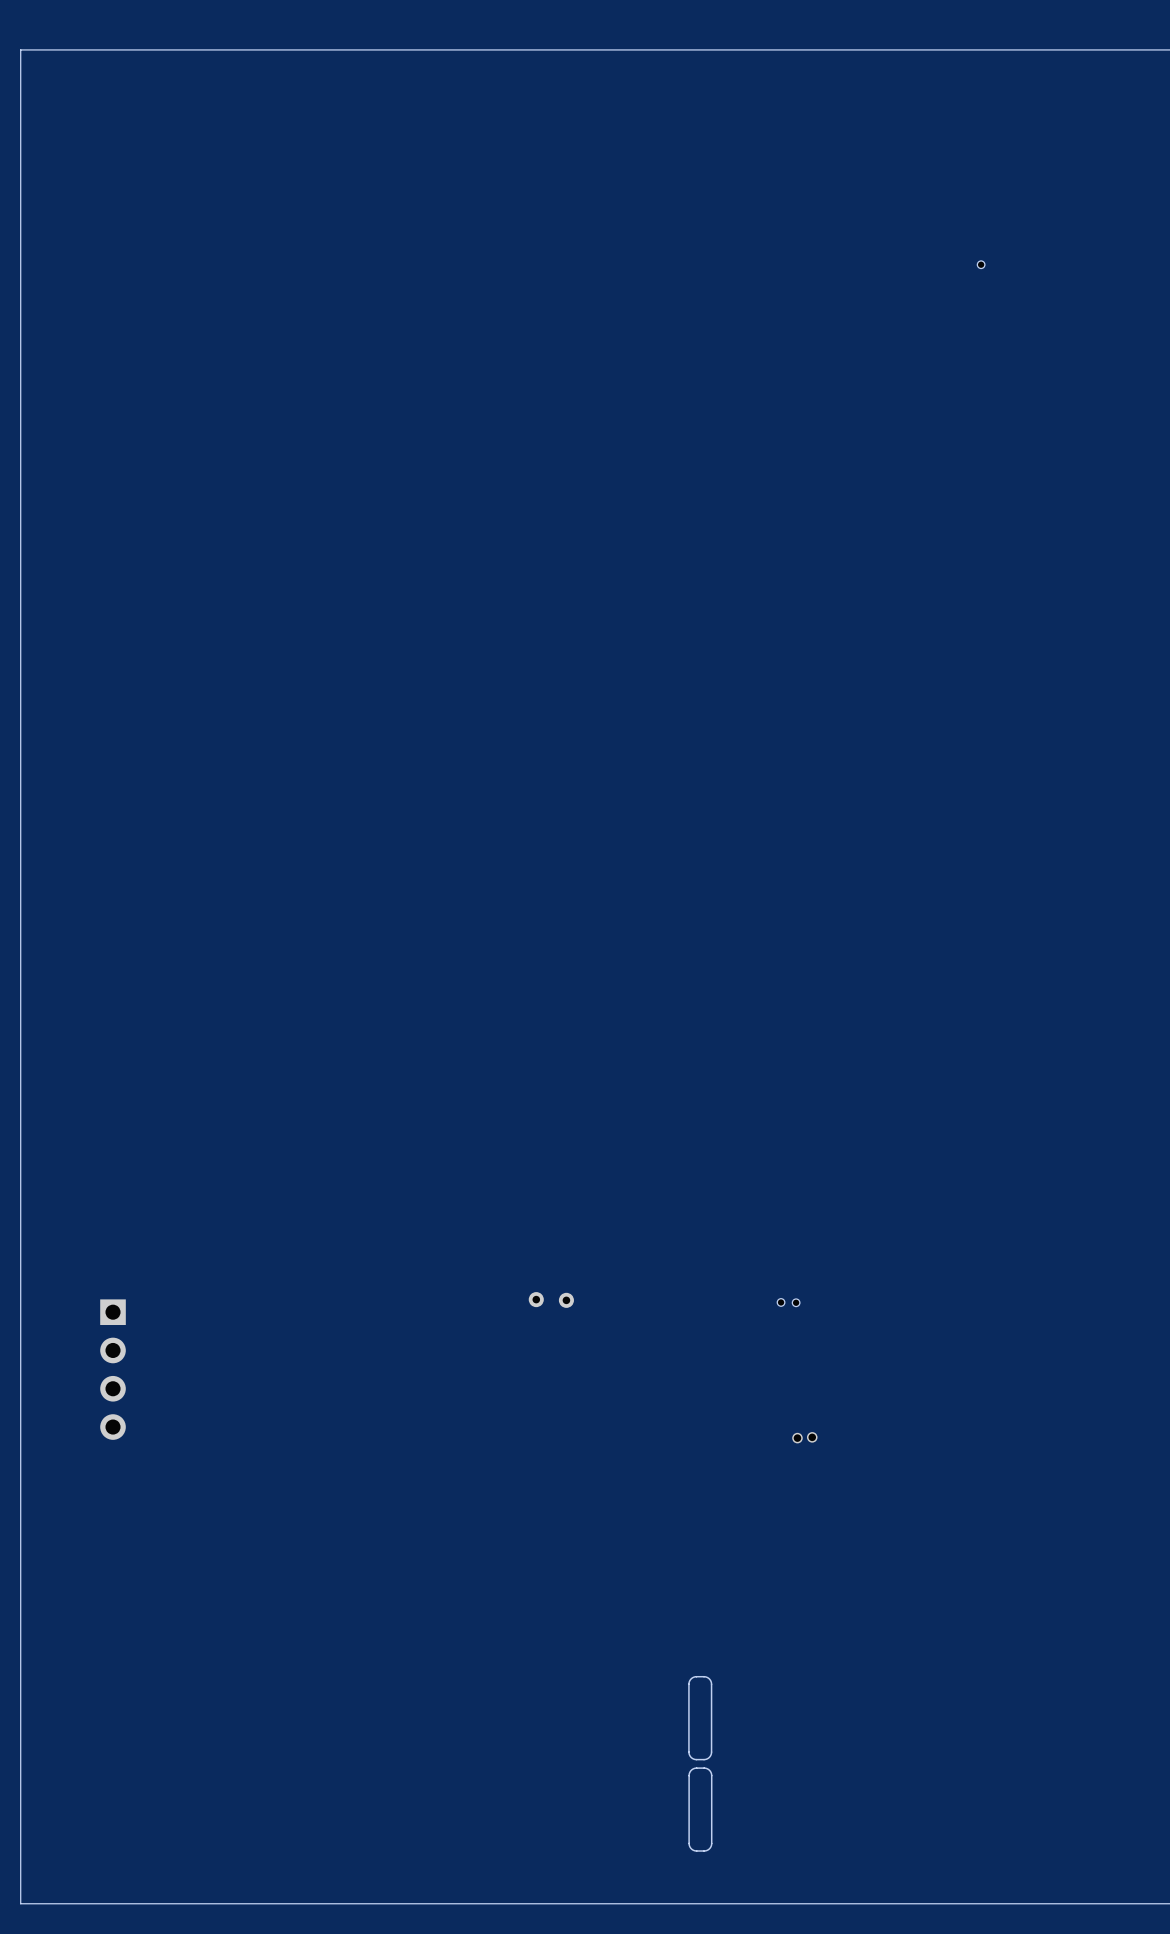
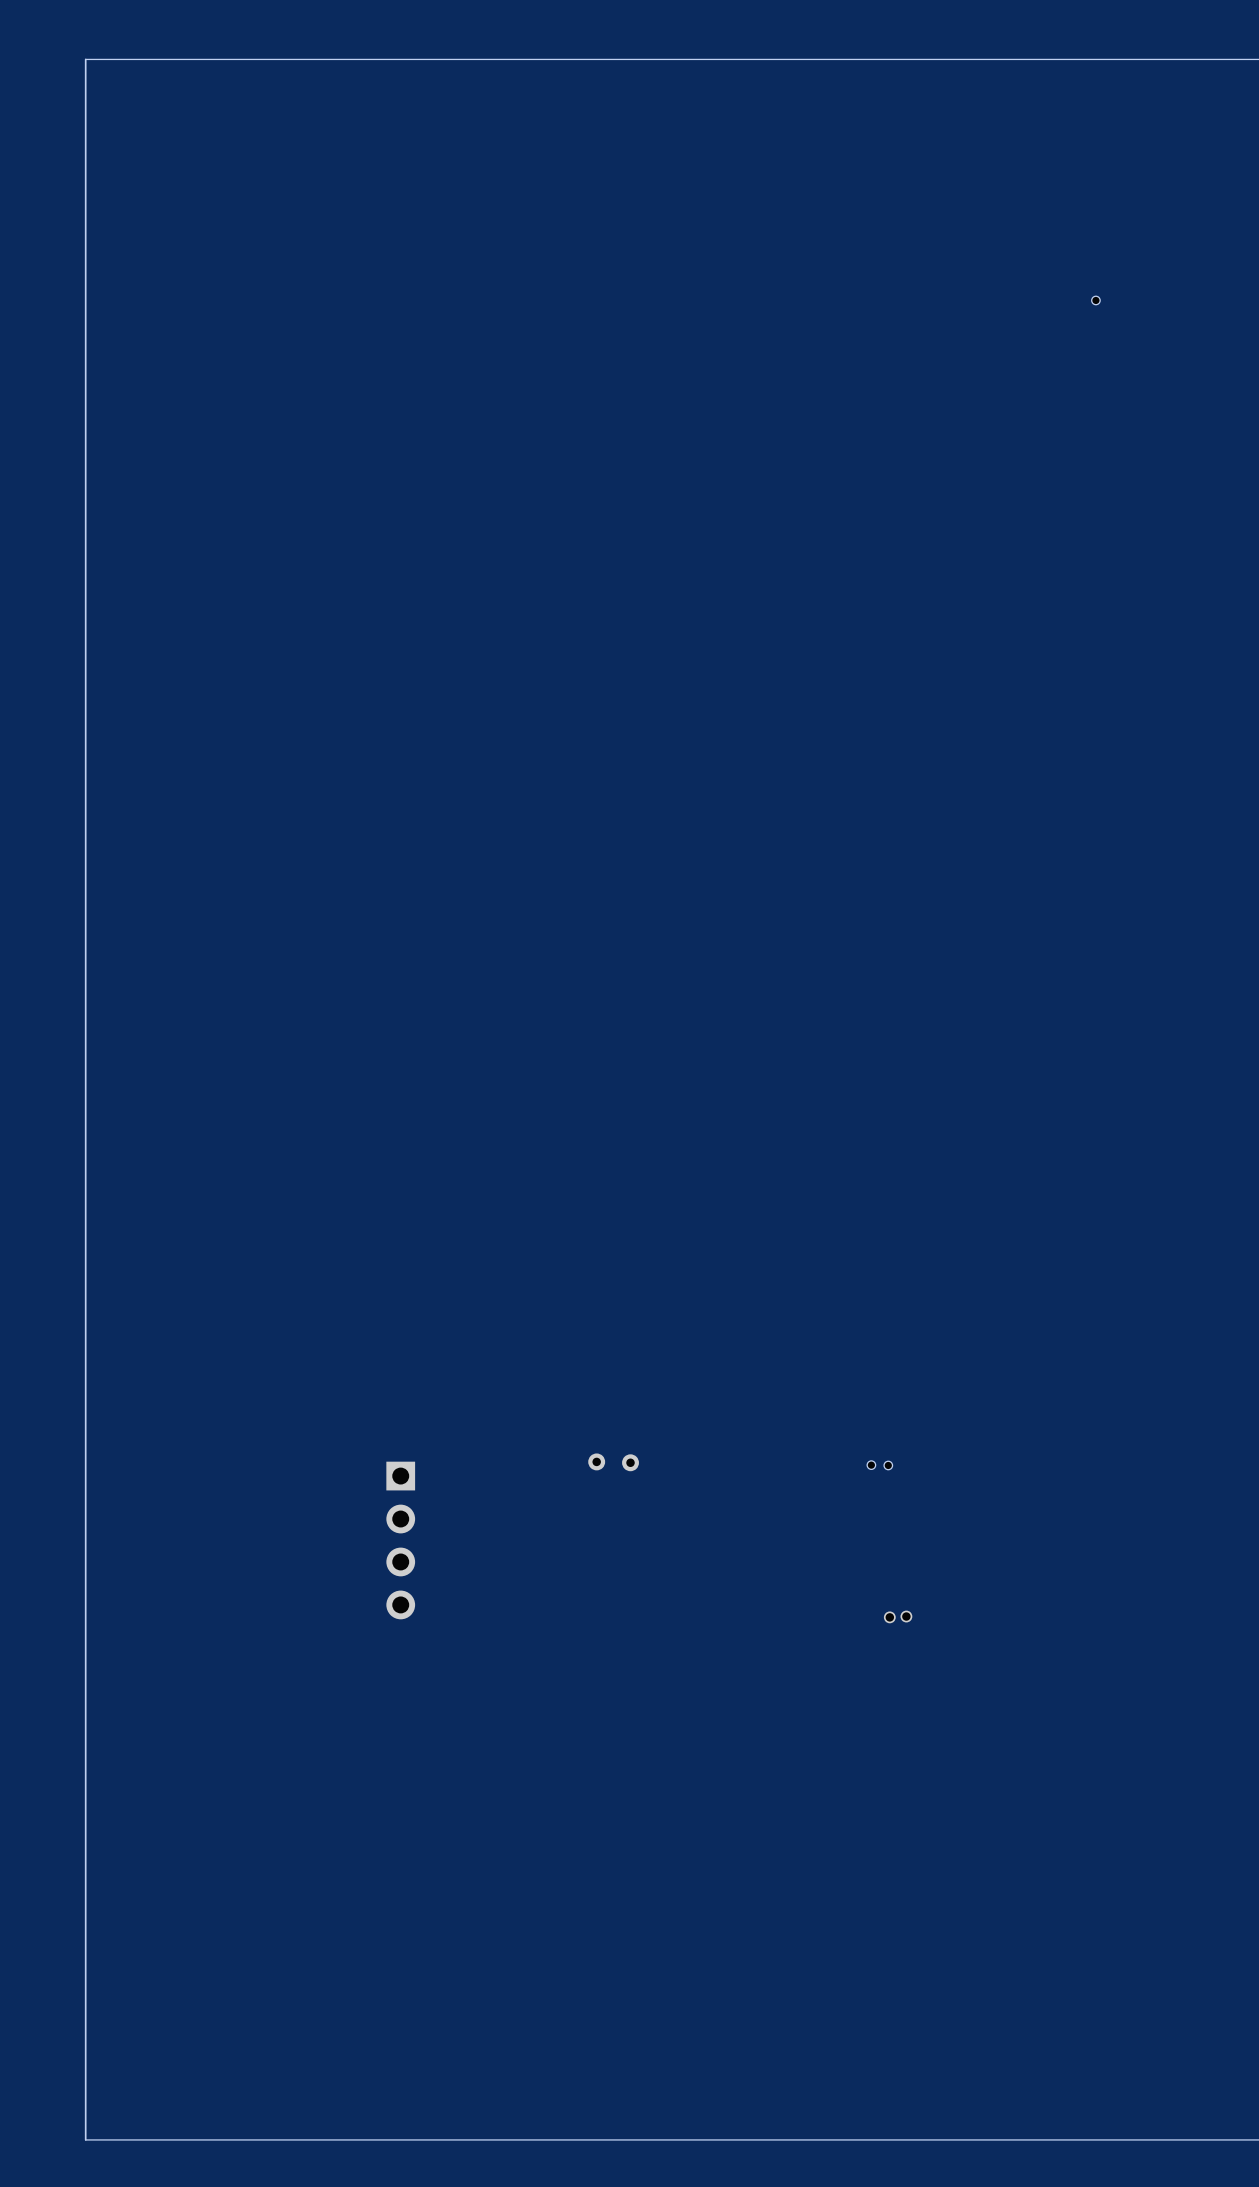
board edge: (80, 49) (20, 49) (20, 1903) (80, 1903) -> (85, 59) (85, 2139)
part position: (113, 1369) -> (400, 1540)
board edge: (704, 1676) (693, 1677) (689, 1683) (689, 1753) (691, 1757) (695, 1759) (706, 1759) (711, 1753) (711, 1683) (709, 1678) (704, 1676) -> none
board edge: (704, 1768) (693, 1768) (689, 1774) (689, 1844) (691, 1848) (695, 1850) (707, 1850) (711, 1844) (711, 1774) (709, 1770) (704, 1768) -> none

